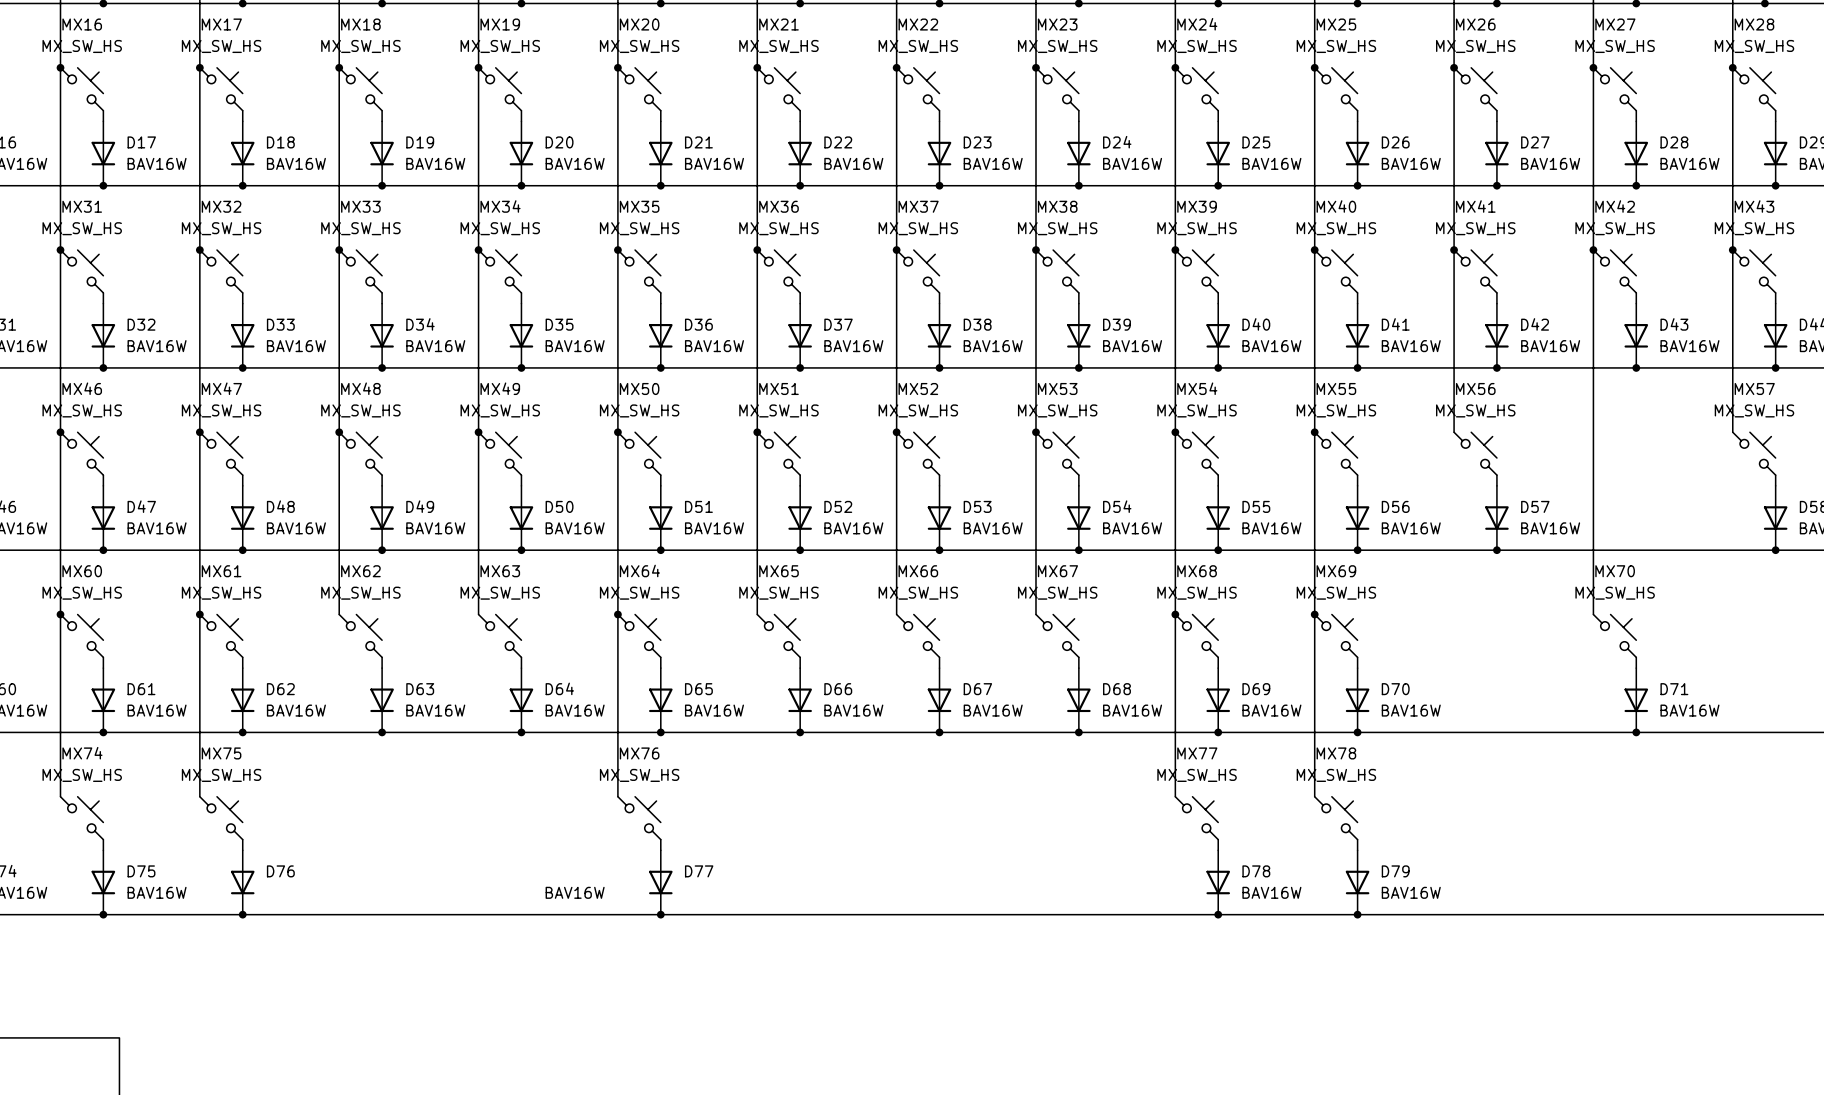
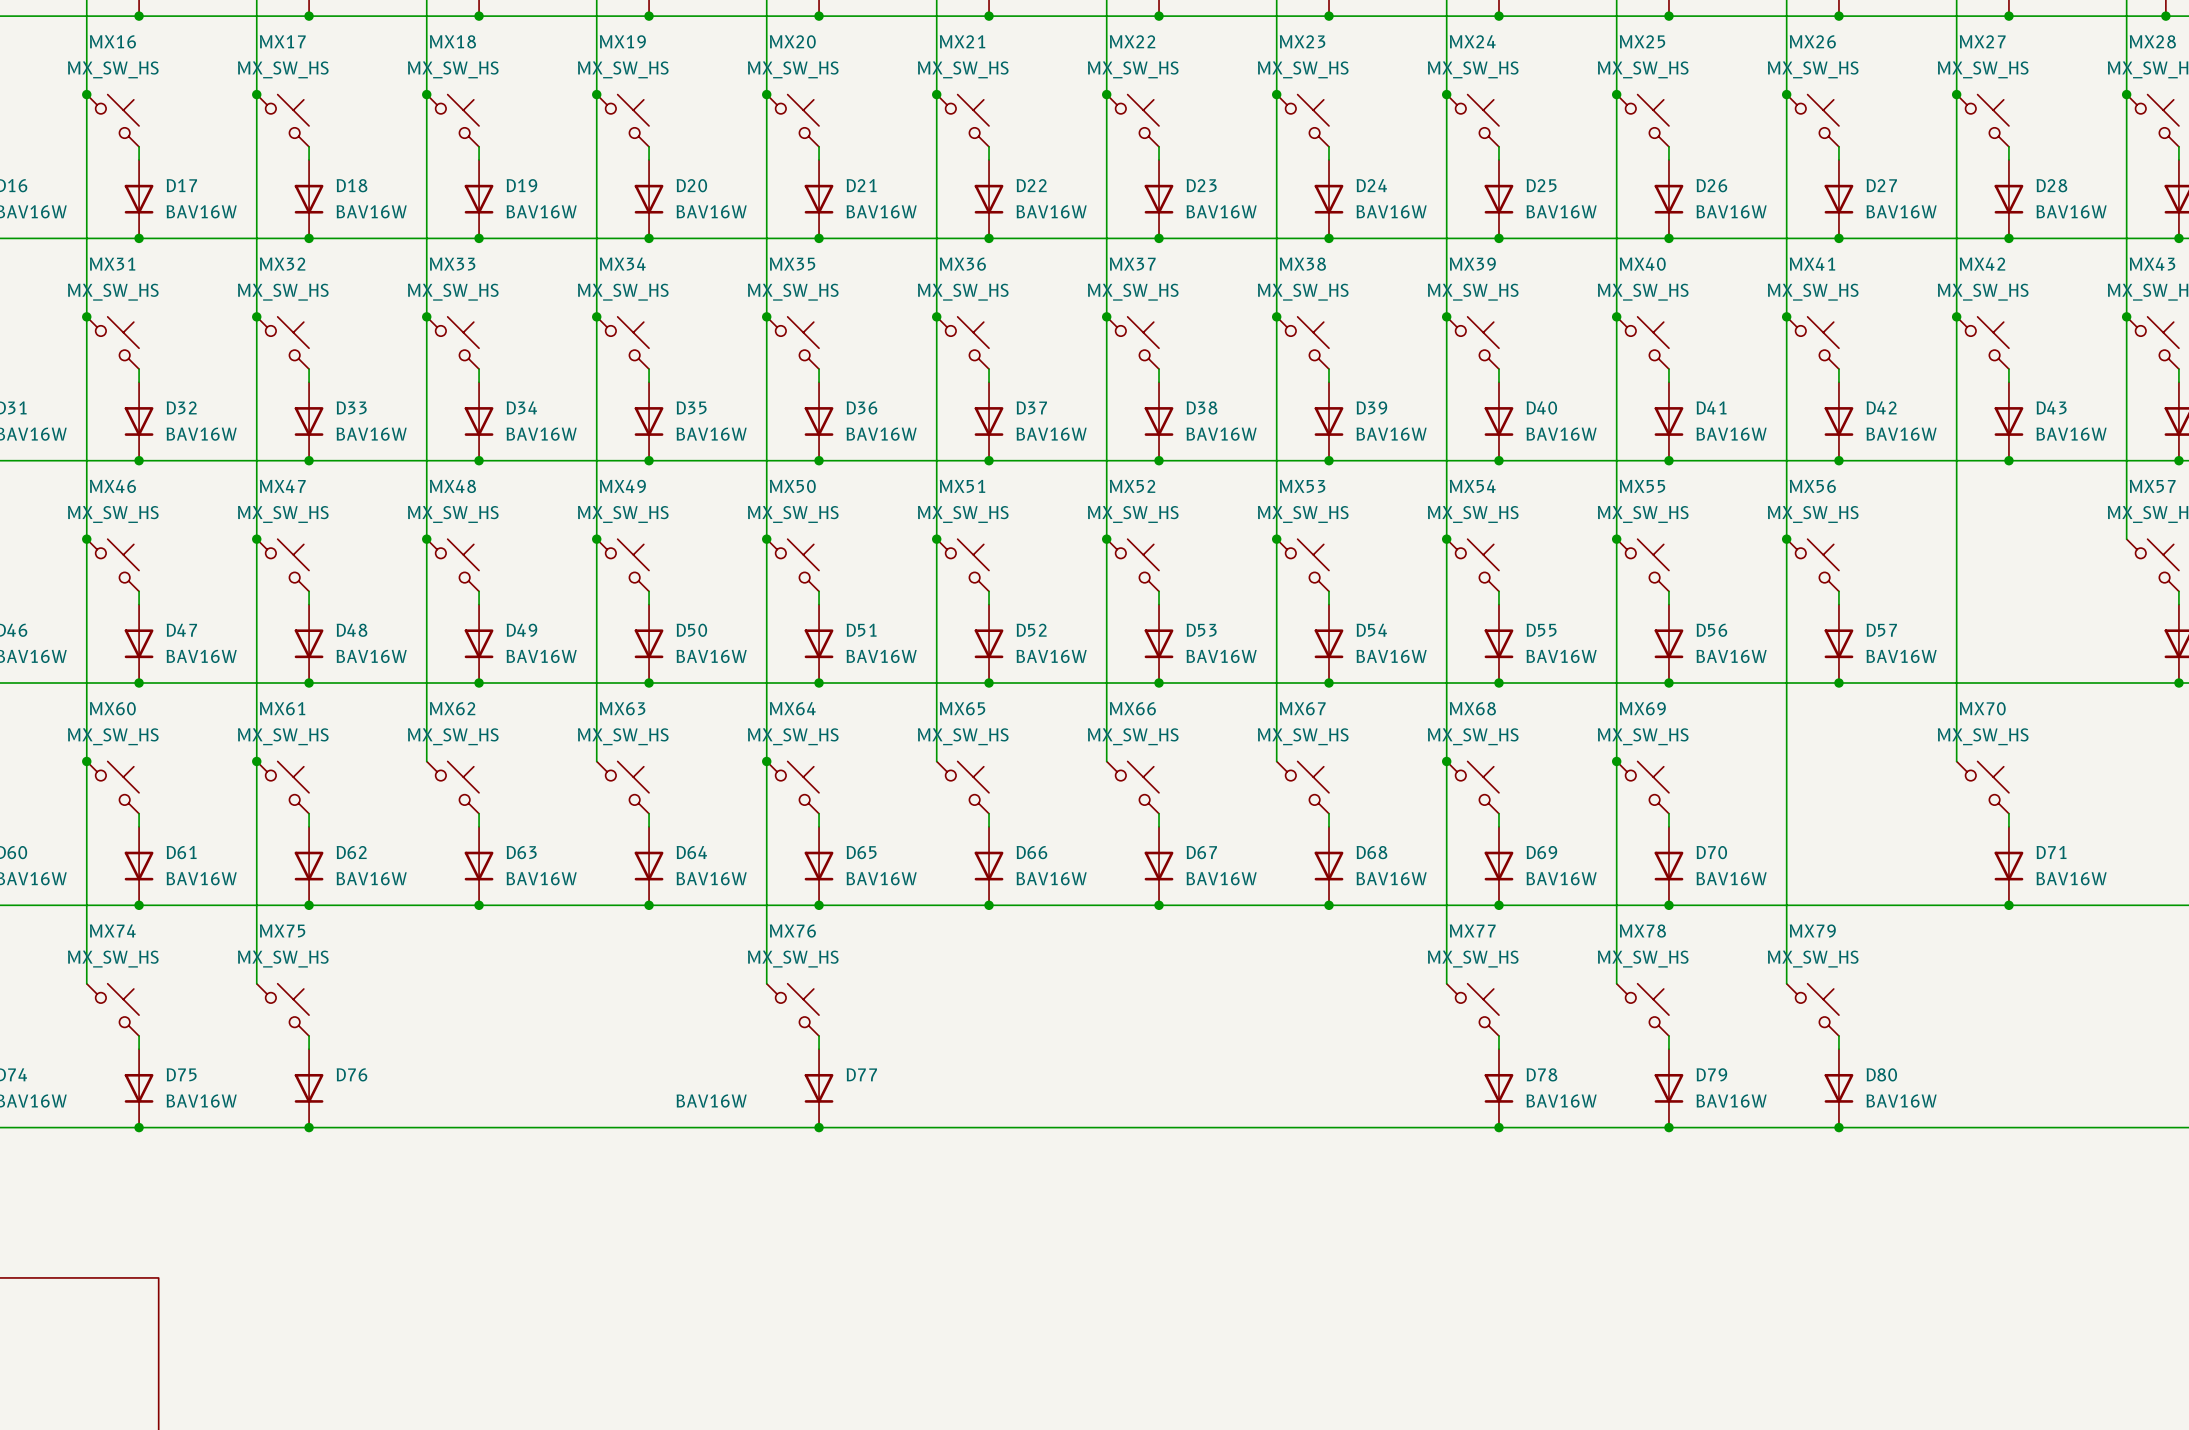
wire: none -> (1786, 539) (1786, 983)
junction: none -> (1786, 539)
MX79: none -> MX_SW_HS (1812, 1009)
wire: none -> (1838, 1036) (1838, 1049)
D80: none -> BAV16W (1838, 1088)
junction: none -> (1838, 1127)

